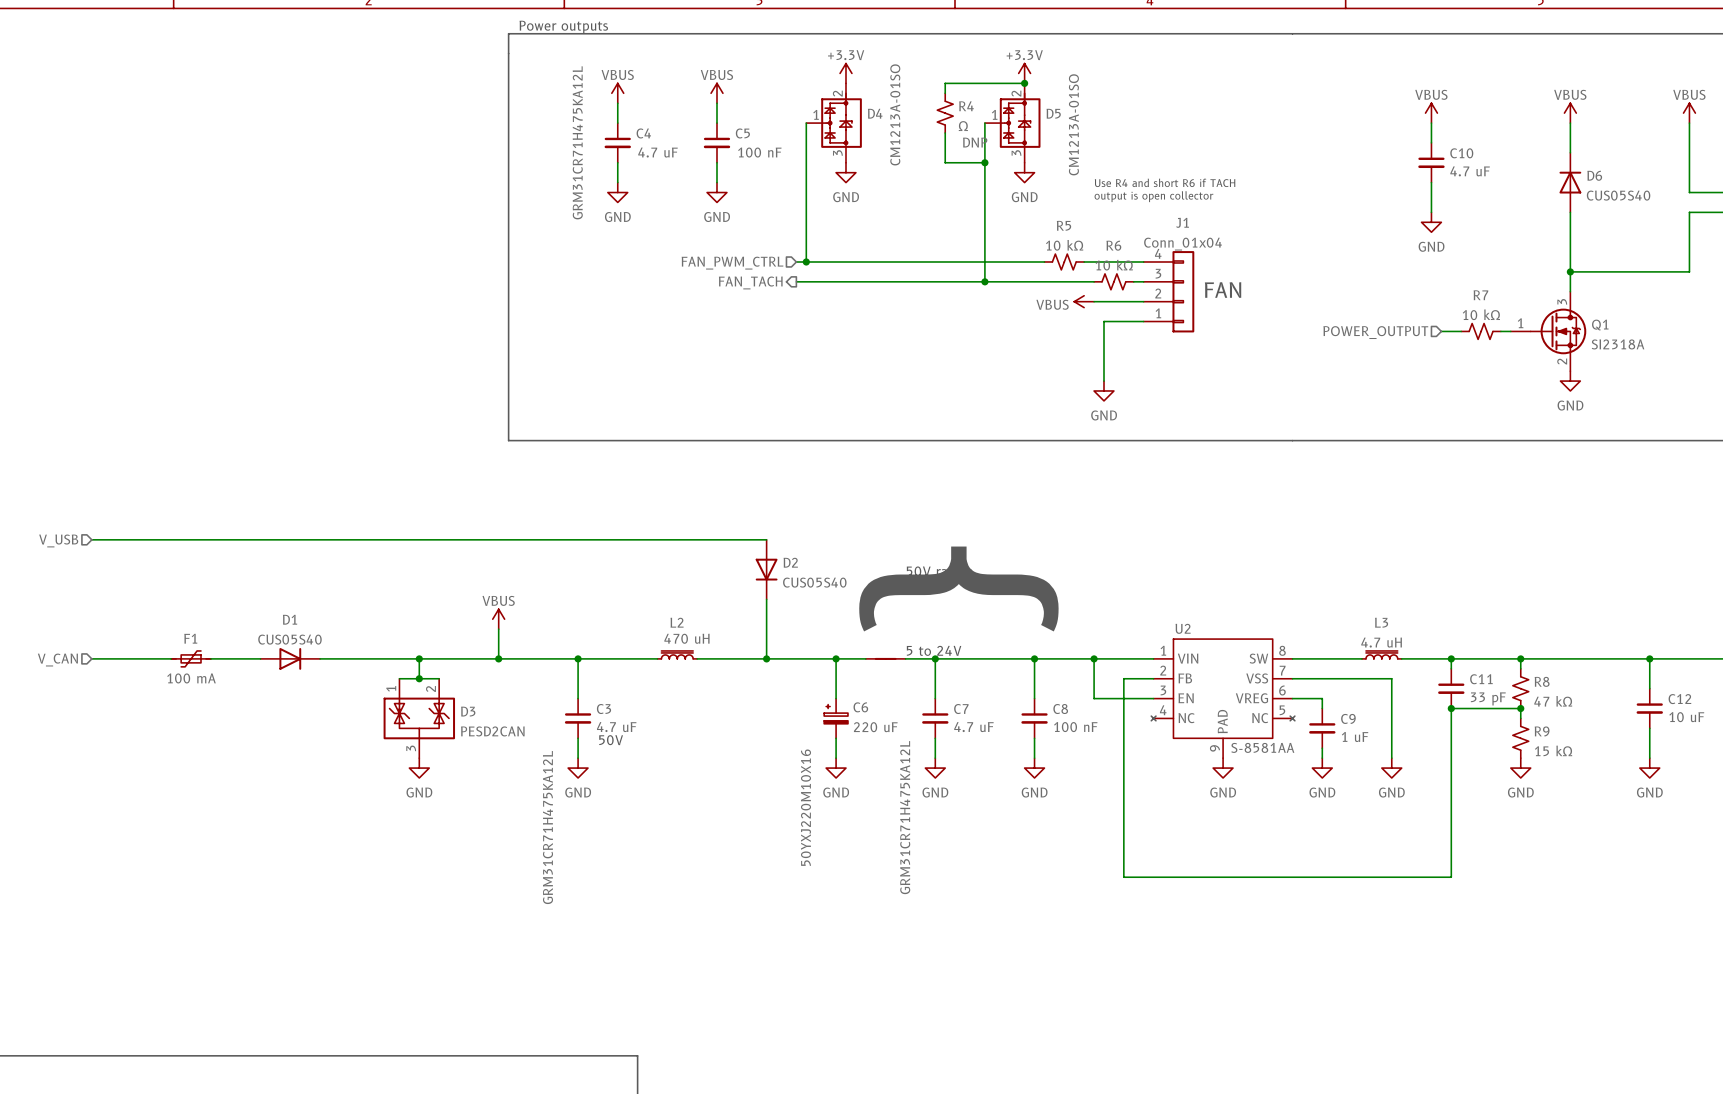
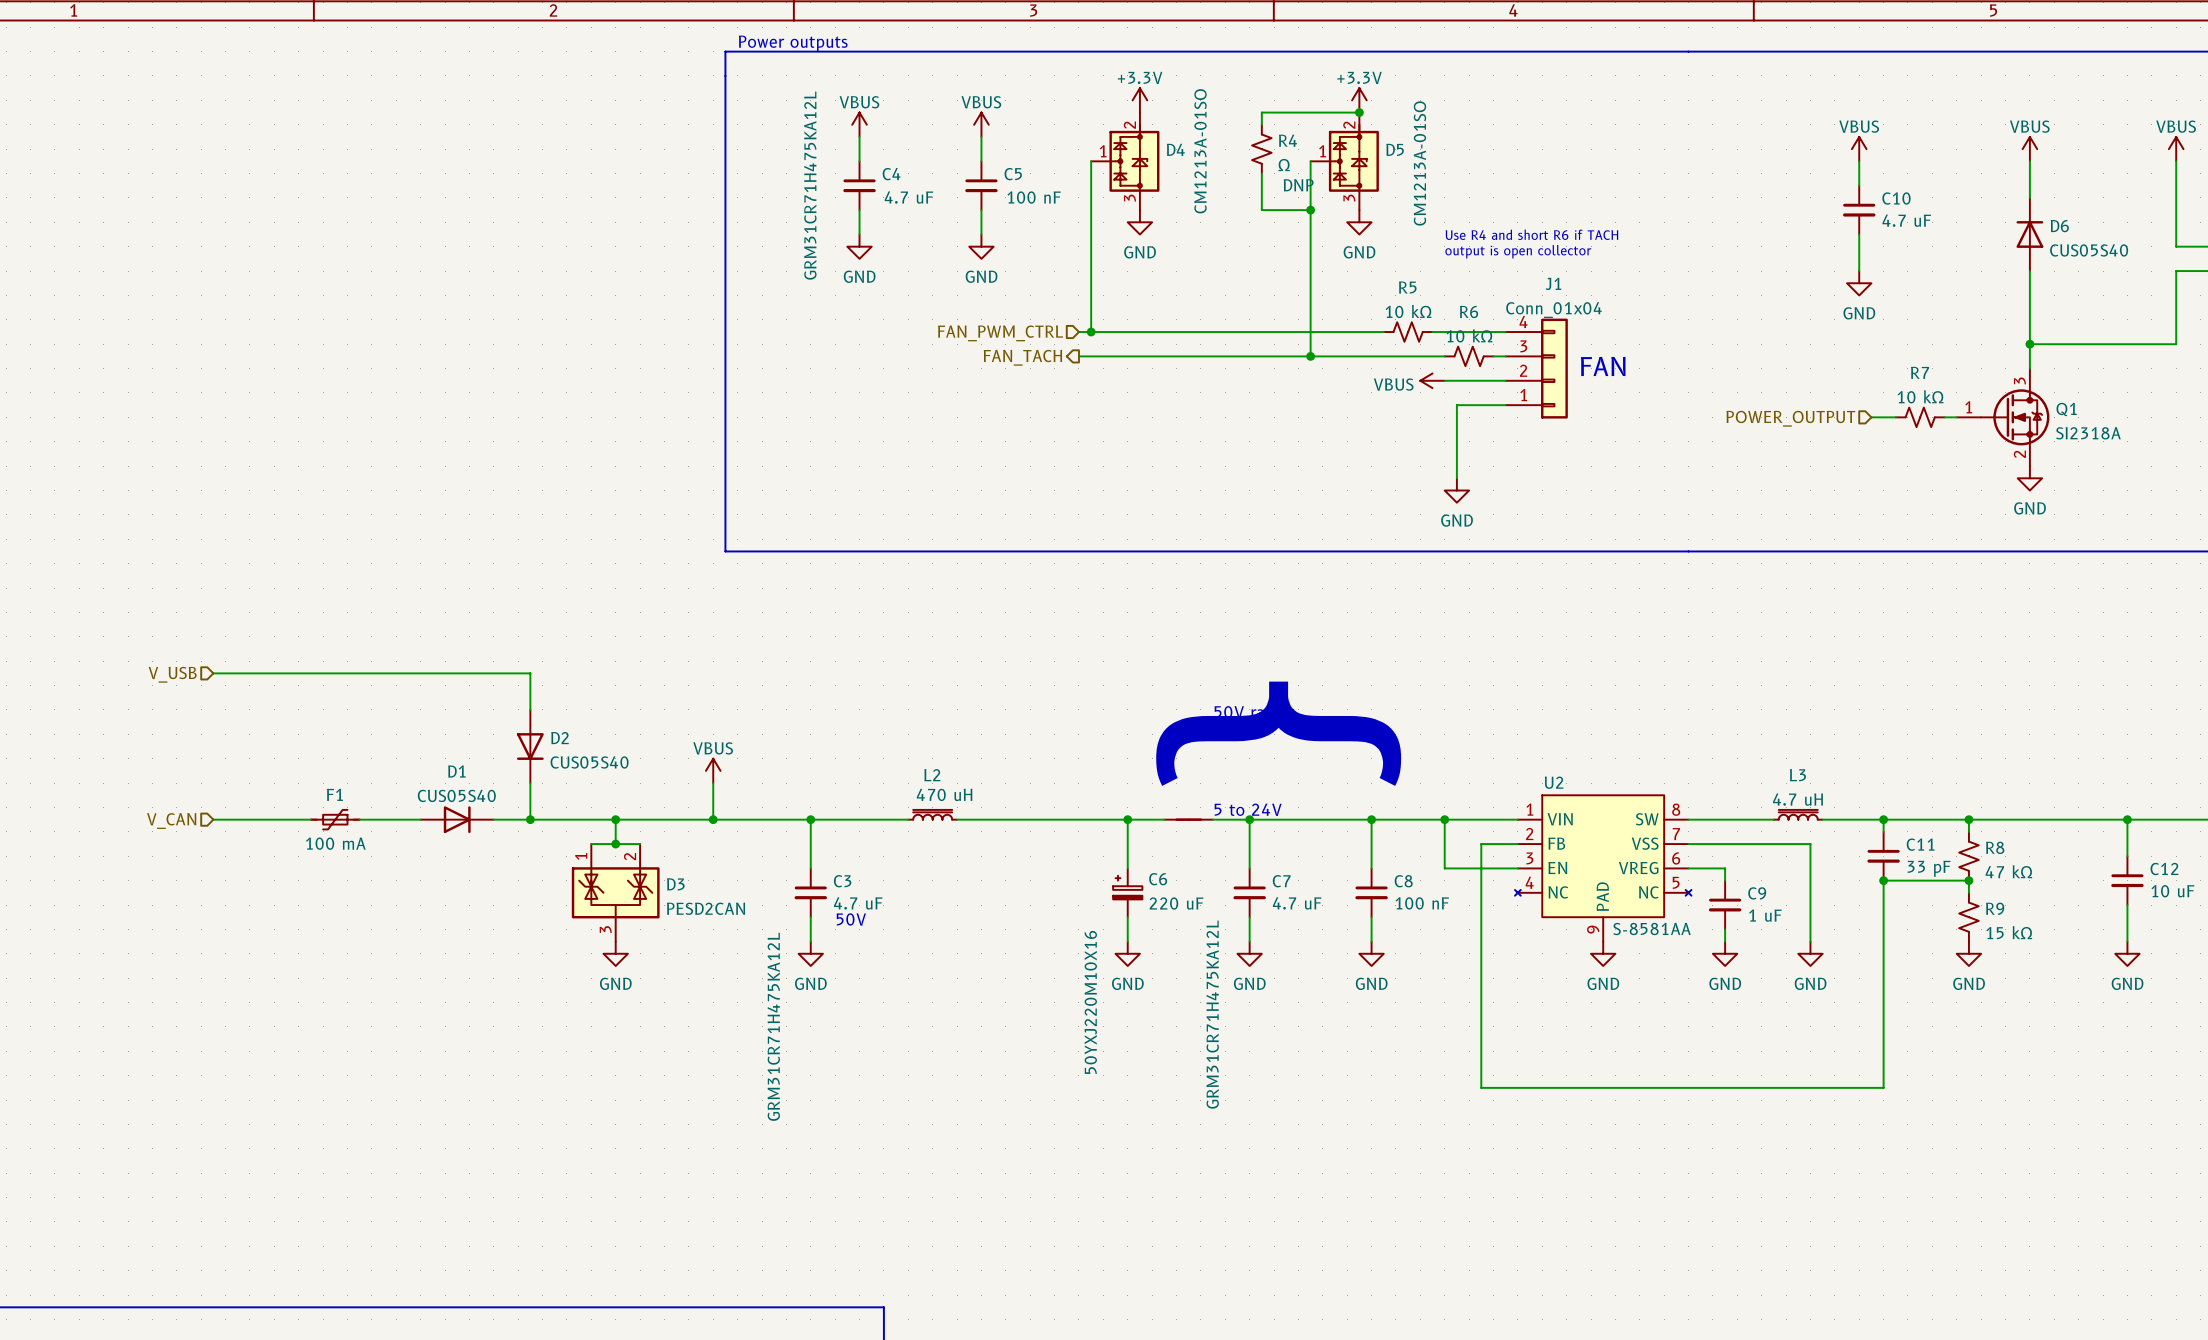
wire: (349, 539) (766, 539) -> (530, 673) (530, 709)
D2 position: (766, 569) -> (530, 746)
wire: (766, 599) (766, 658) -> none
wire: none -> (530, 783) (530, 819)
junction: none -> (530, 819)
junction: (766, 658) -> none

